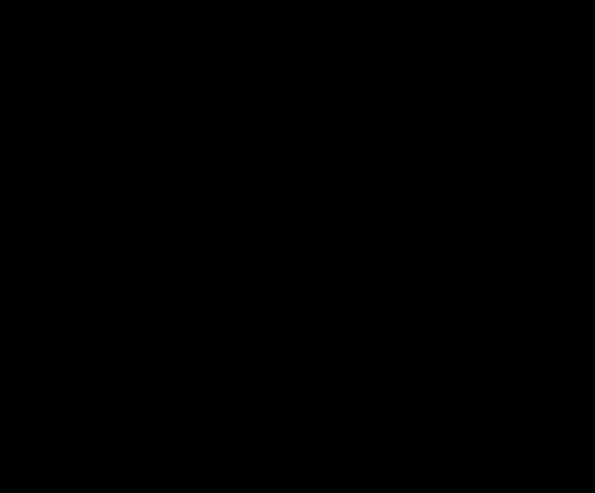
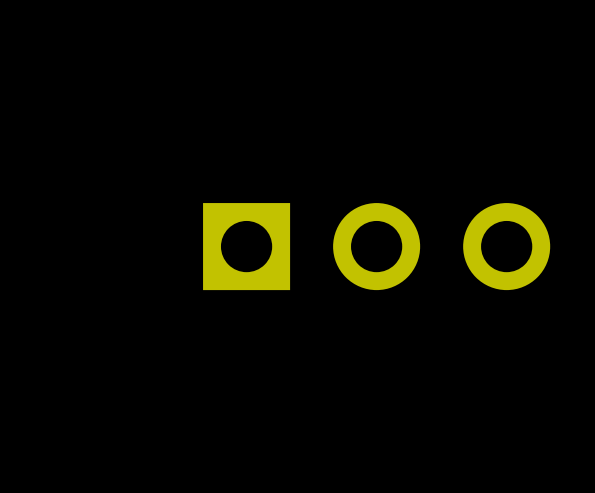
part: none -> (376, 246)

